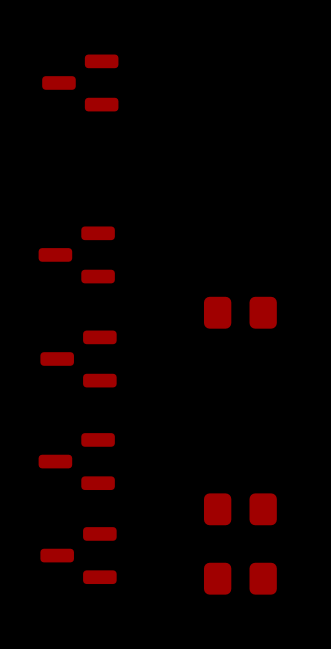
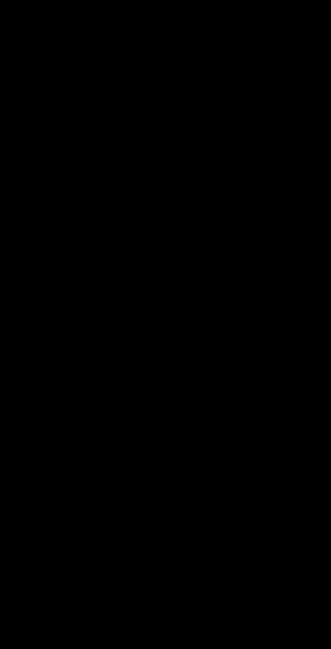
part: (80, 82) -> none
part: (76, 254) -> none
part: (240, 312) -> none
part: (78, 358) -> none
part: (76, 461) -> none
part: (240, 509) -> none
part: (78, 555) -> none
part: (240, 578) -> none

